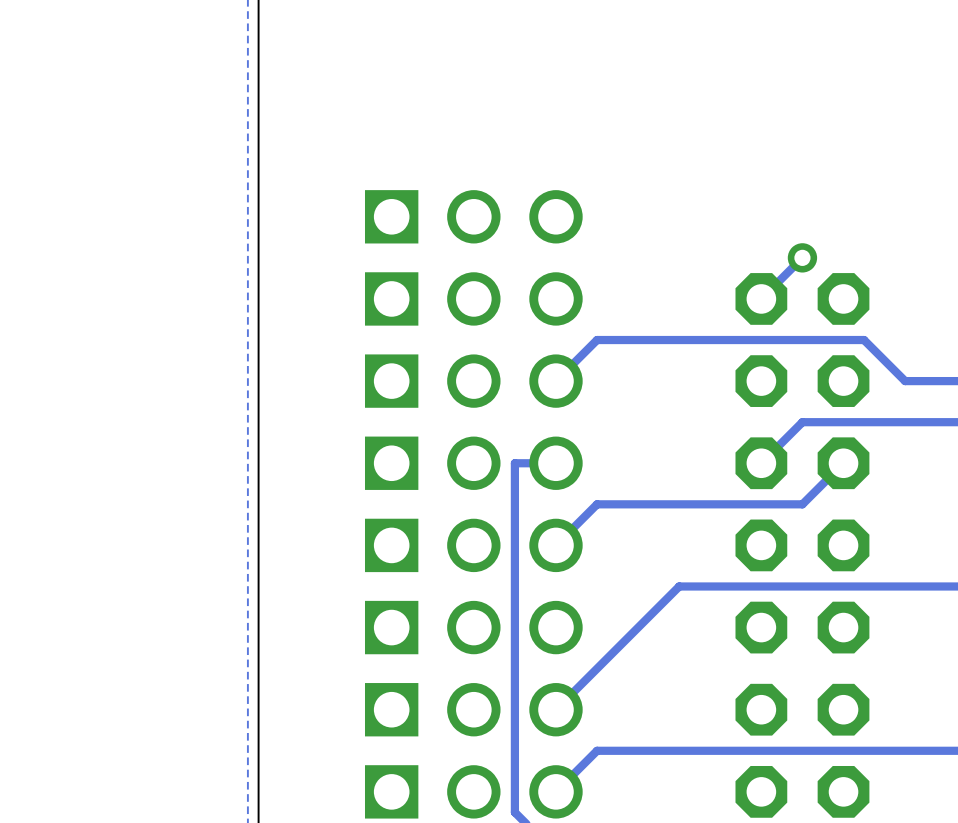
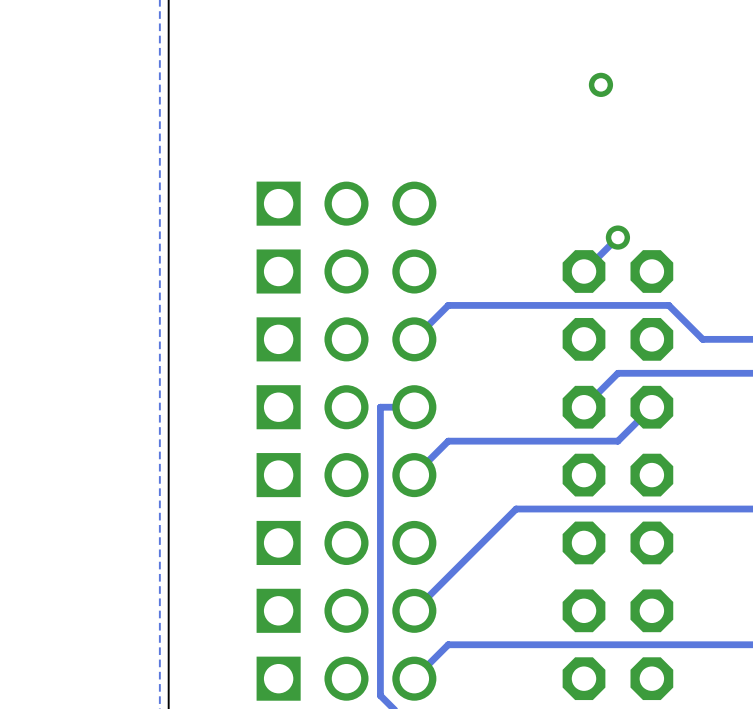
via: none -> (600, 84)

